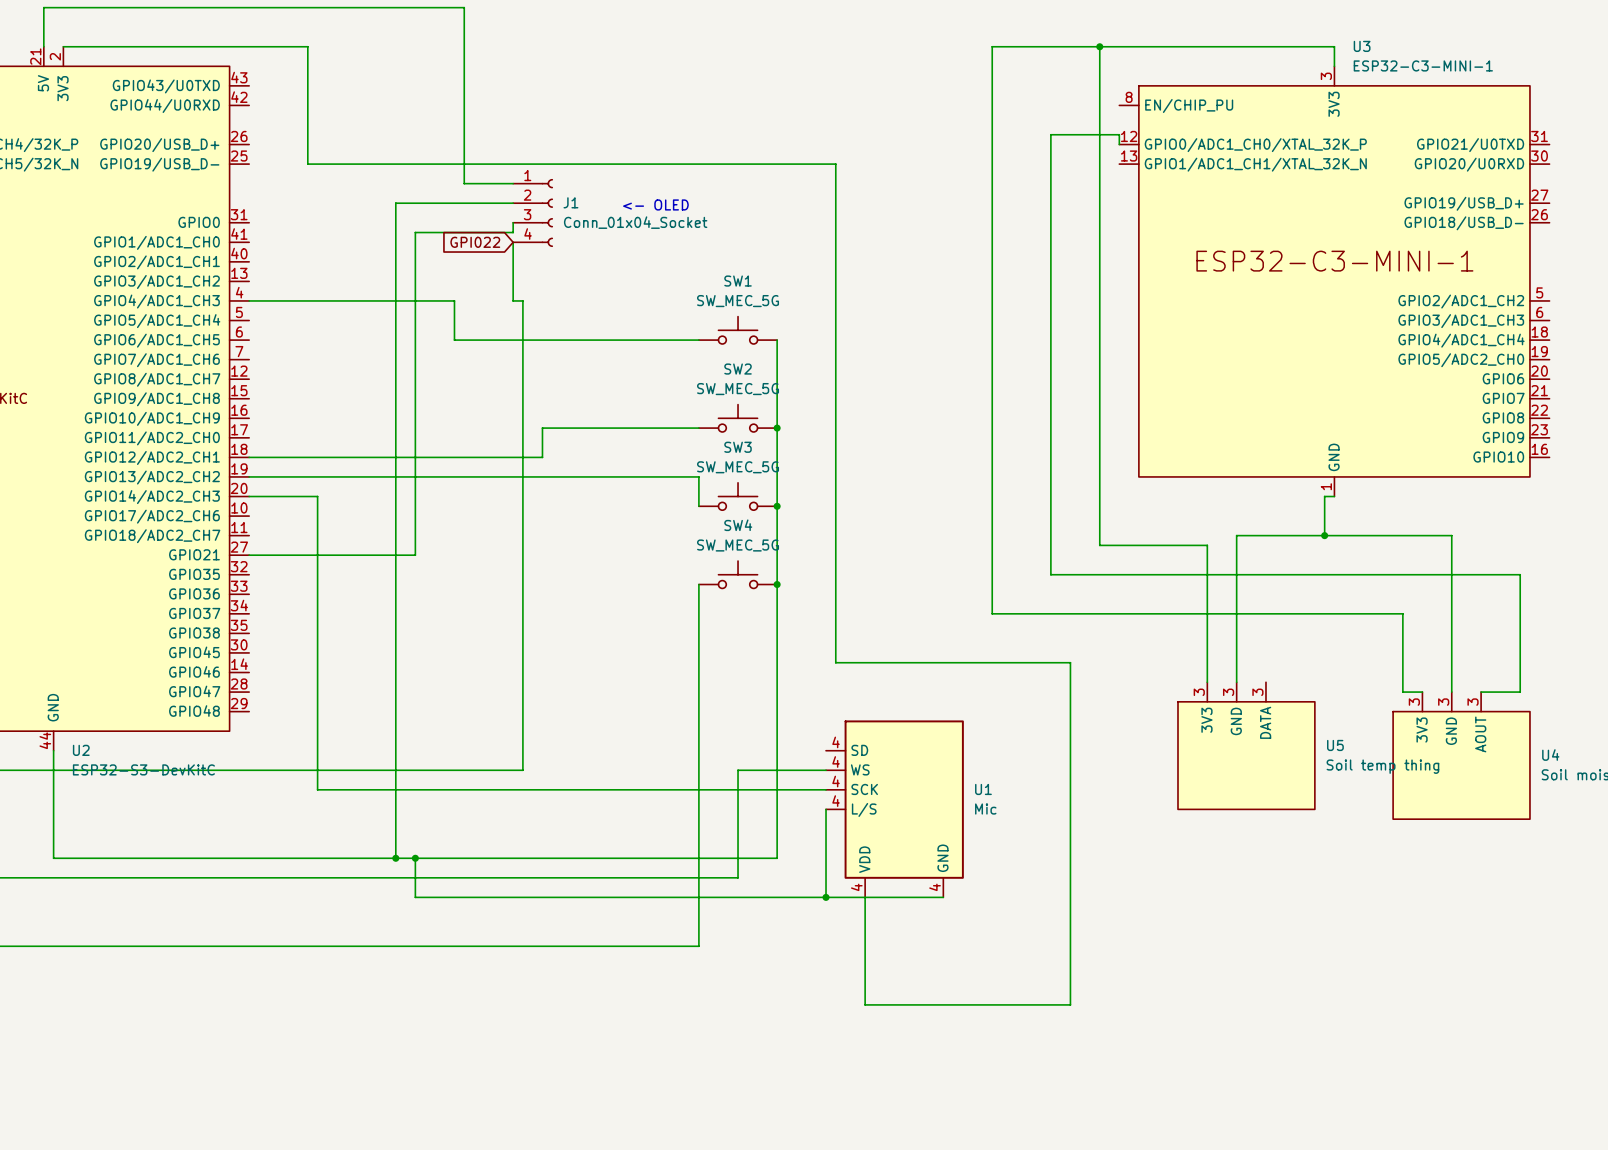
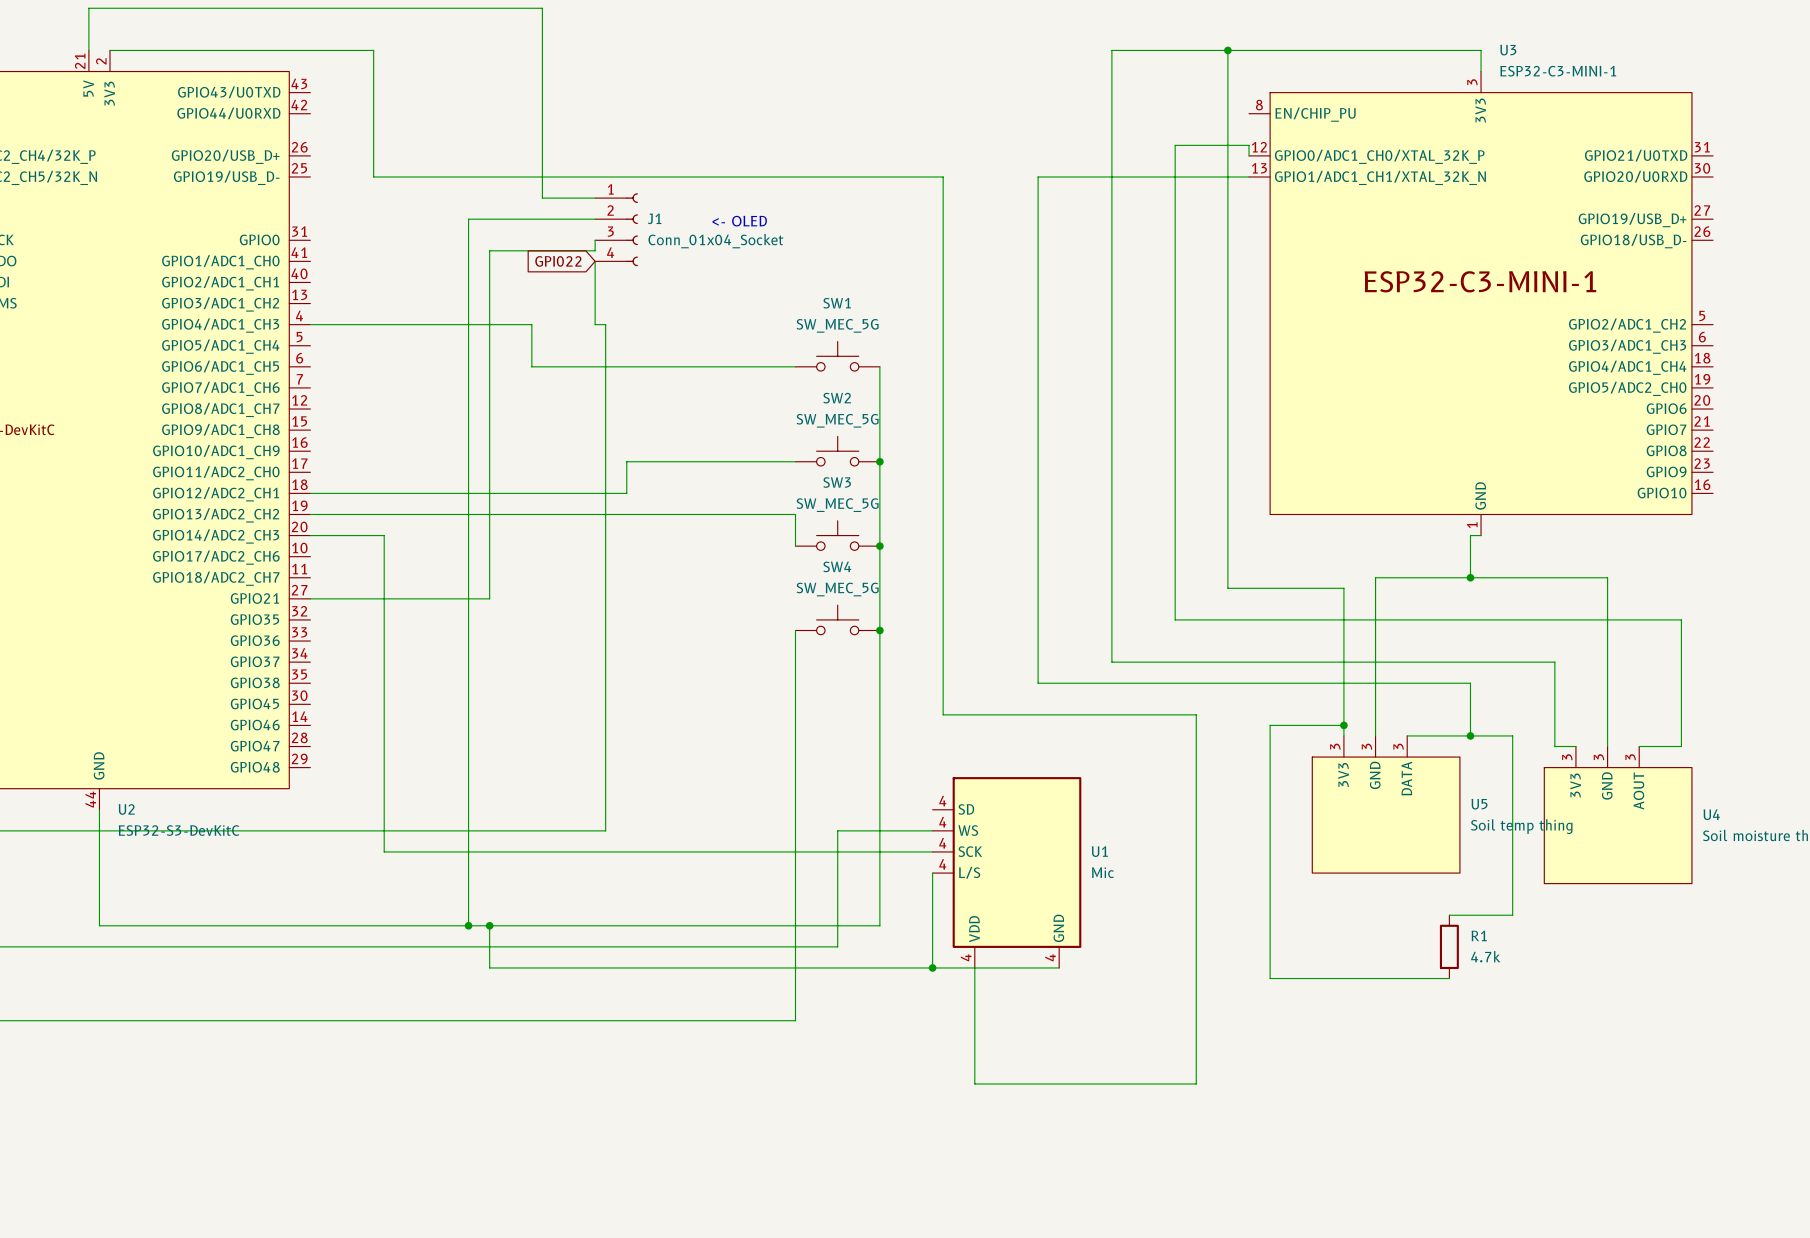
wire: none -> (1249, 177) (1038, 177) (1038, 683) (1470, 683) (1470, 735)
wire: none -> (1343, 725) (1270, 725) (1270, 978) (1449, 978)
junction: none -> (1343, 725)
wire: none -> (1407, 735) (1512, 735) (1512, 915) (1449, 915)
junction: none -> (1470, 735)
R1: none -> 4.7k (1449, 946)

